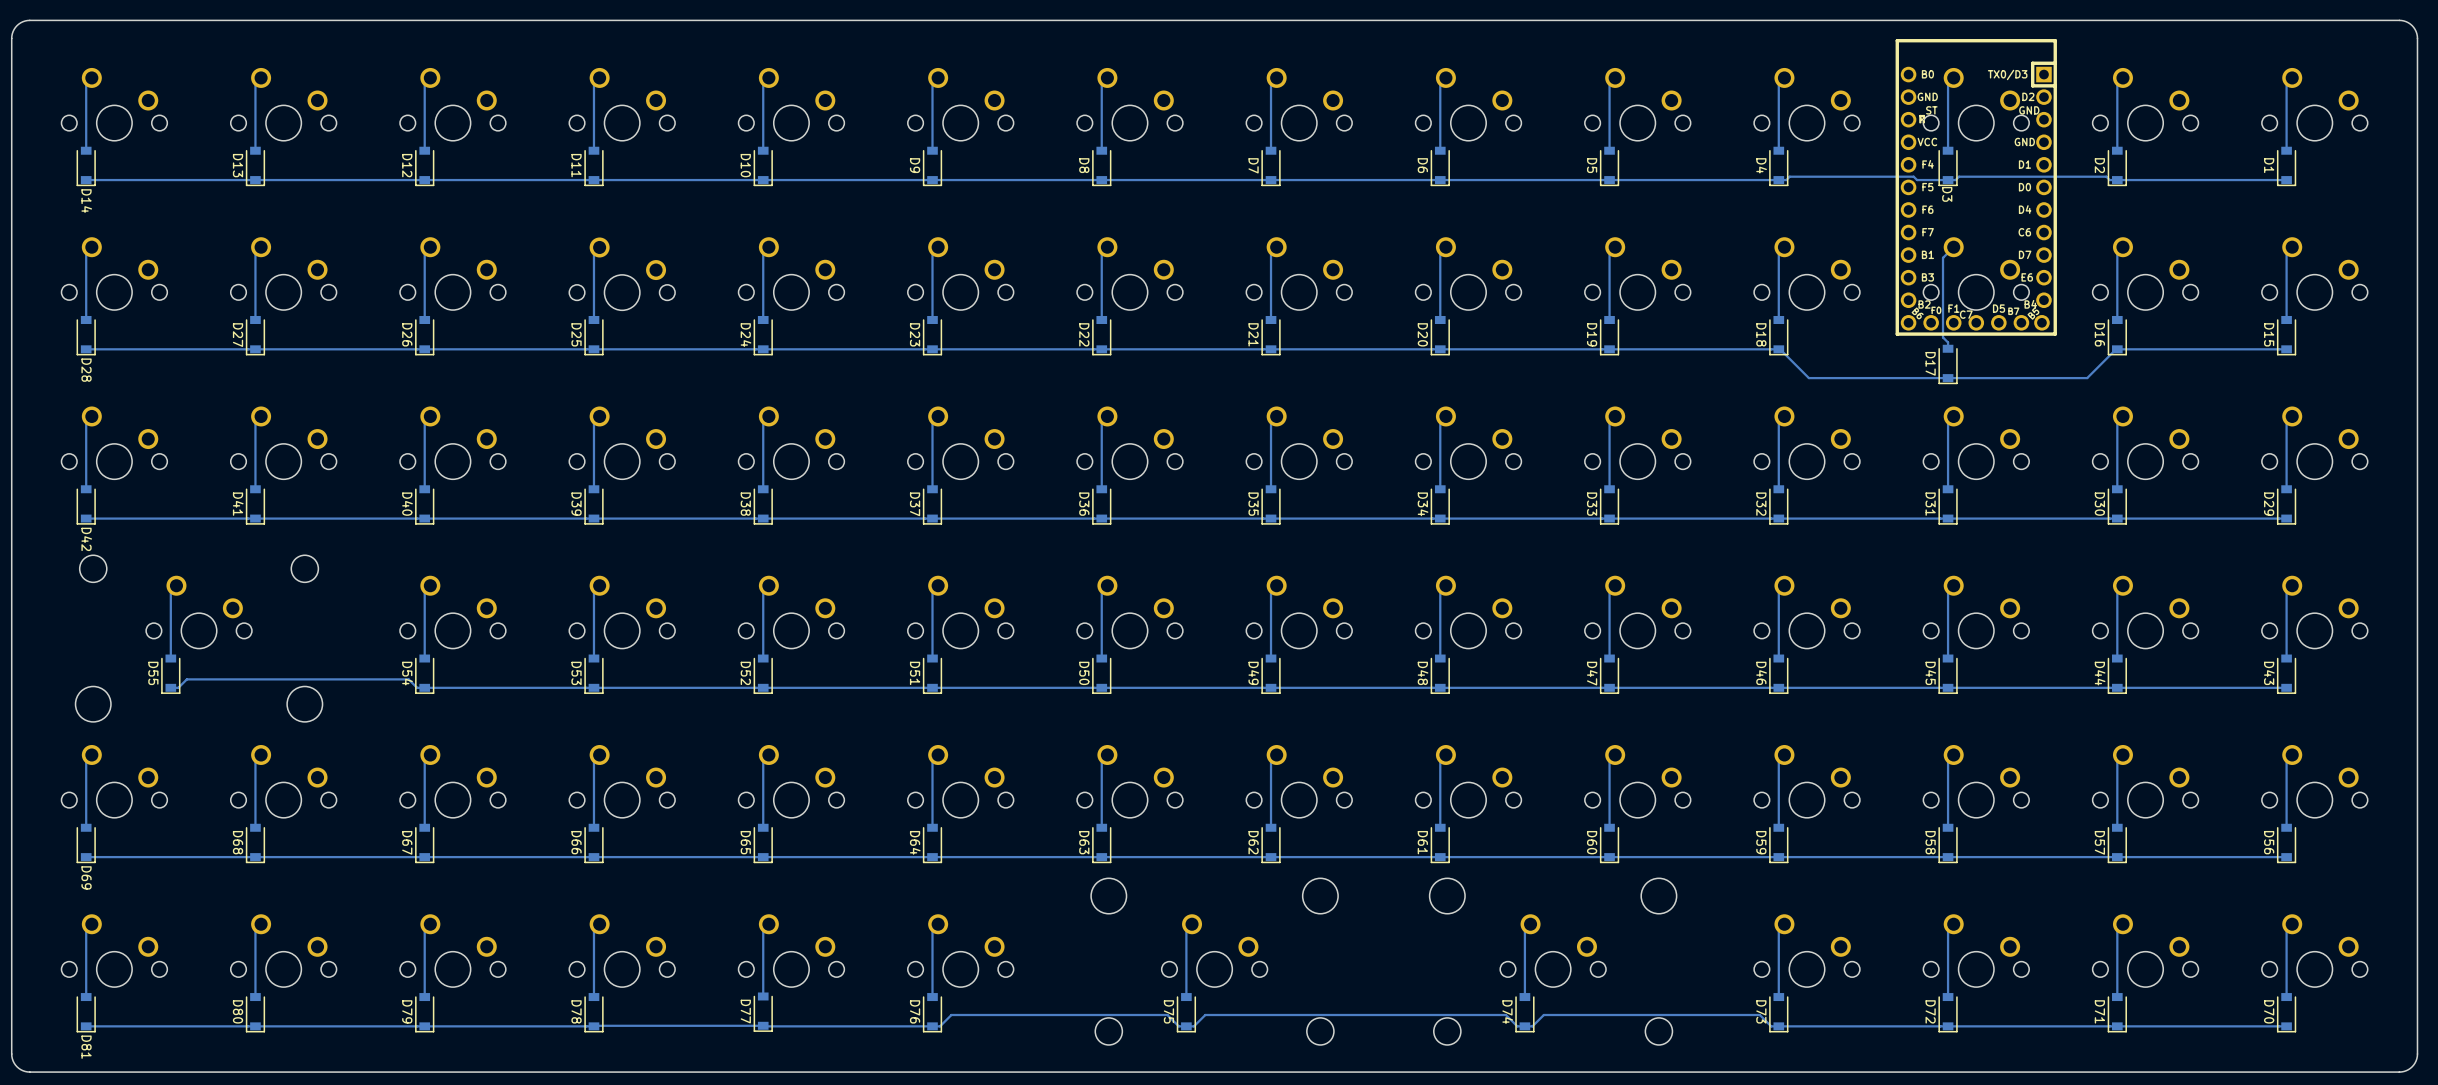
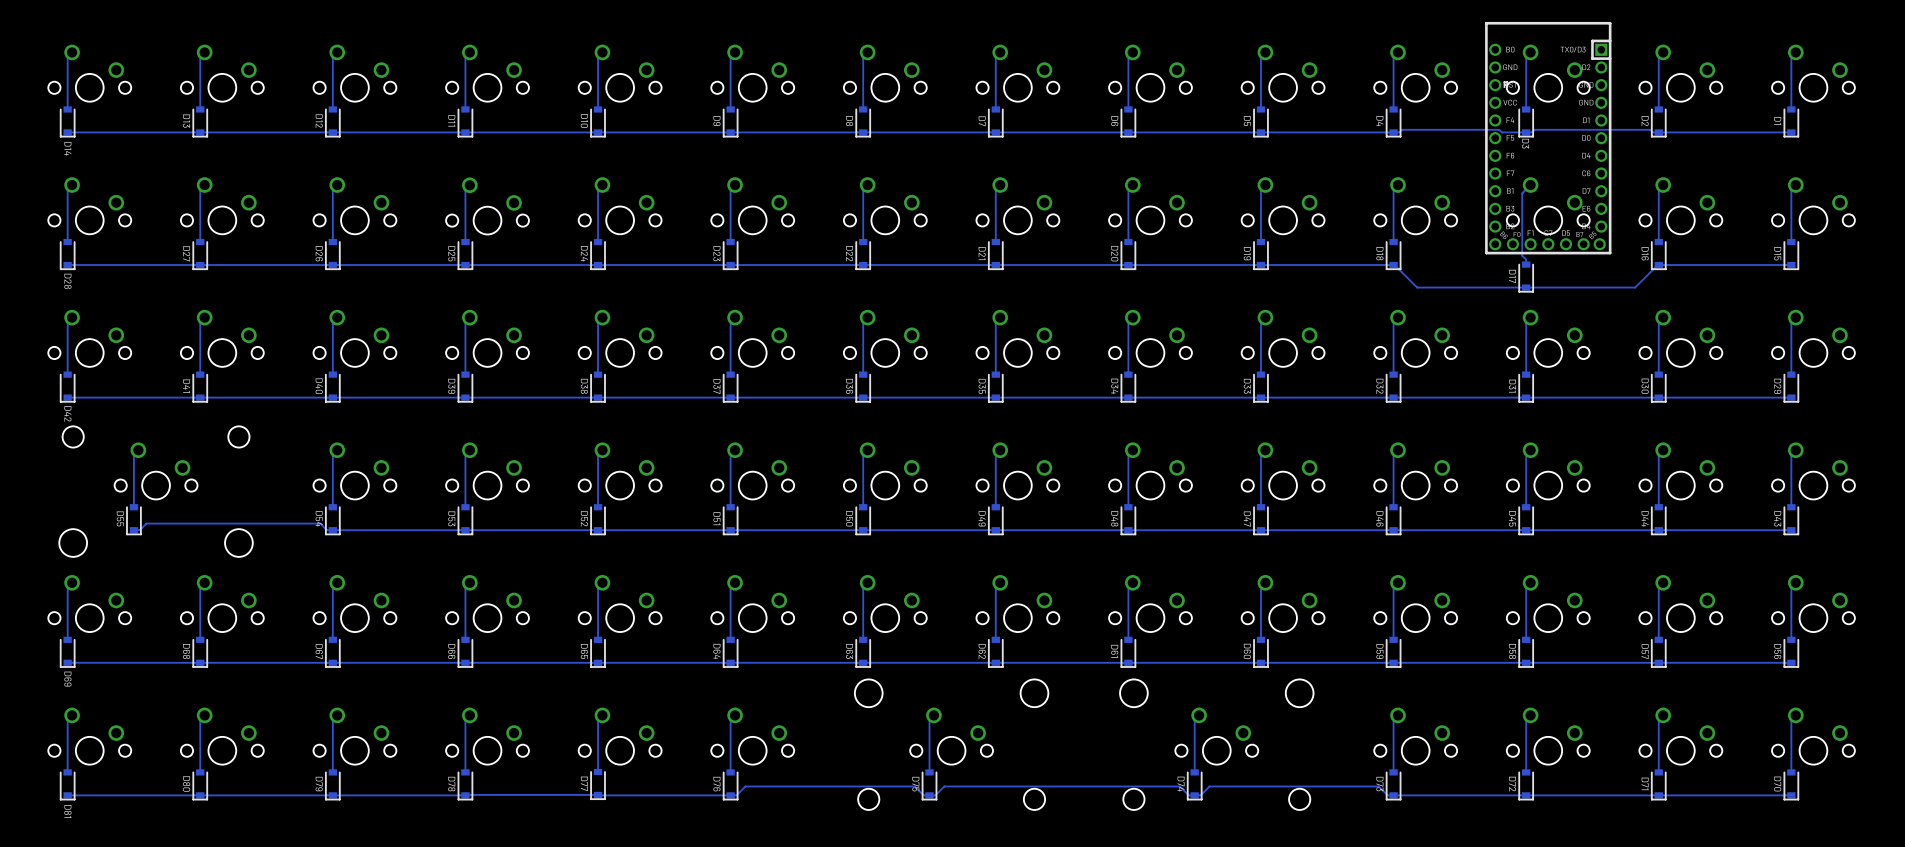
board edge: (2399, 20) (22, 21) (15, 27) (11, 38) (13, 1060) (20, 1069) (29, 1072) (2406, 1070) (2413, 1065) (2417, 1054) (2417, 38) (2412, 25) (2399, 20) -> none
part footprint: [1895, 39, 2057, 336] -> [1485, 21, 1612, 255]

